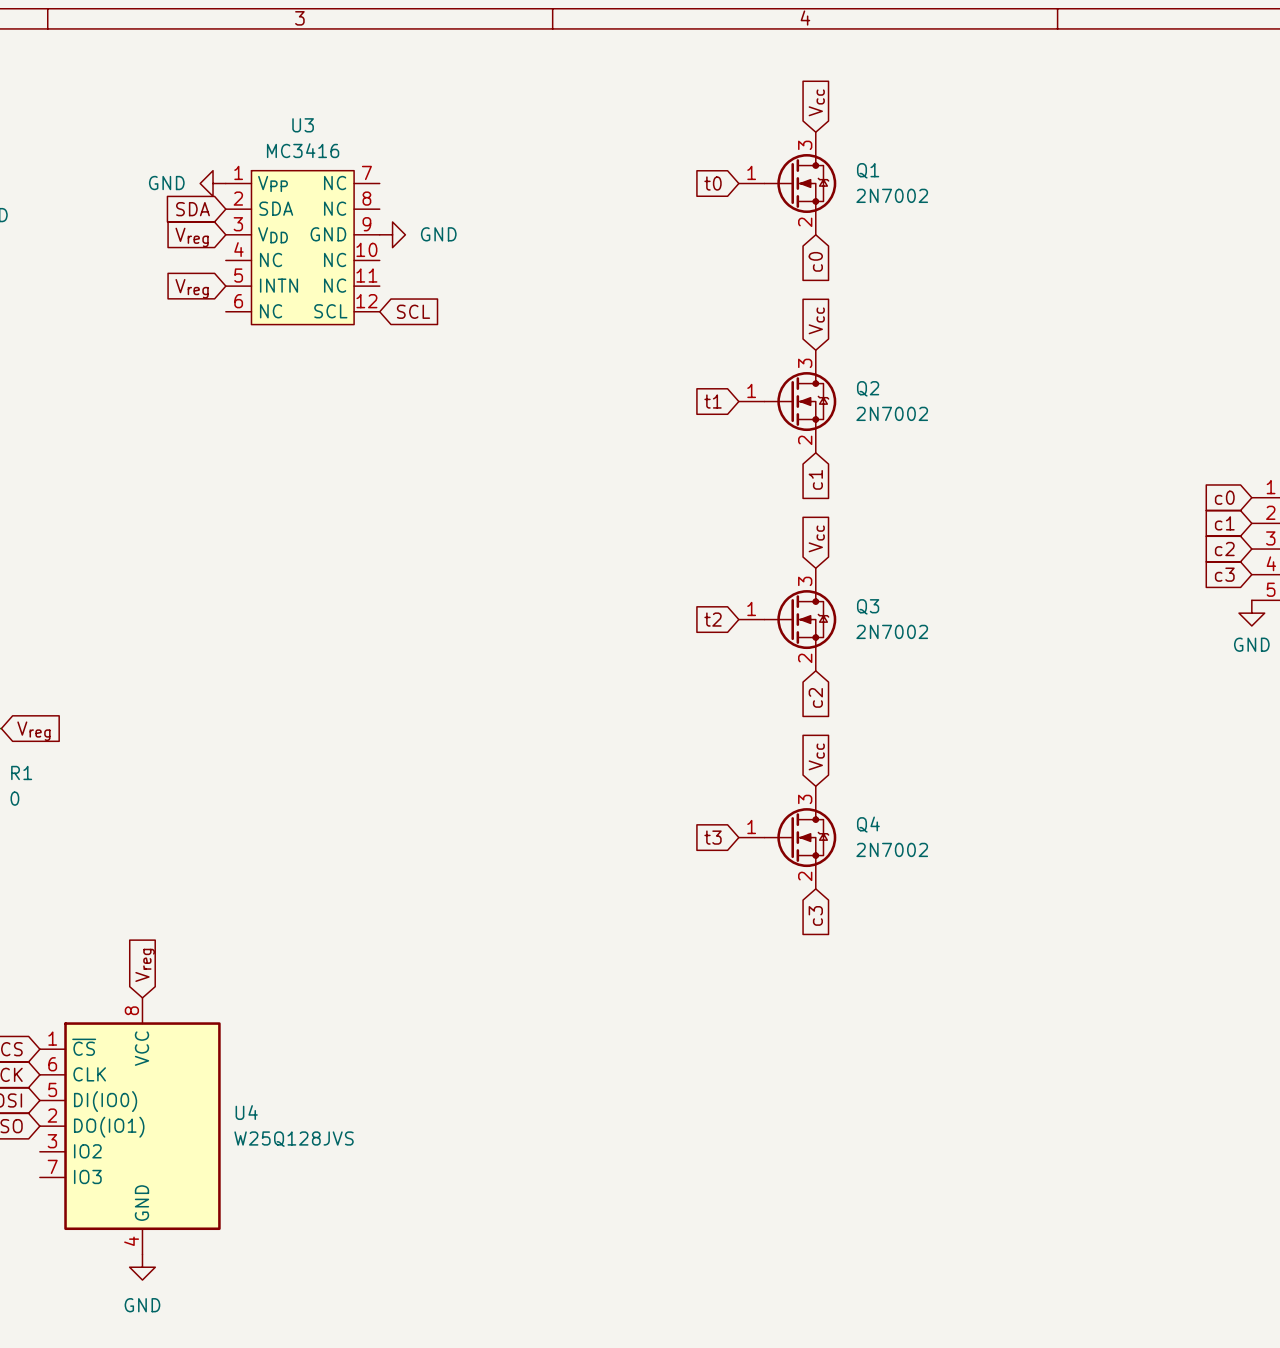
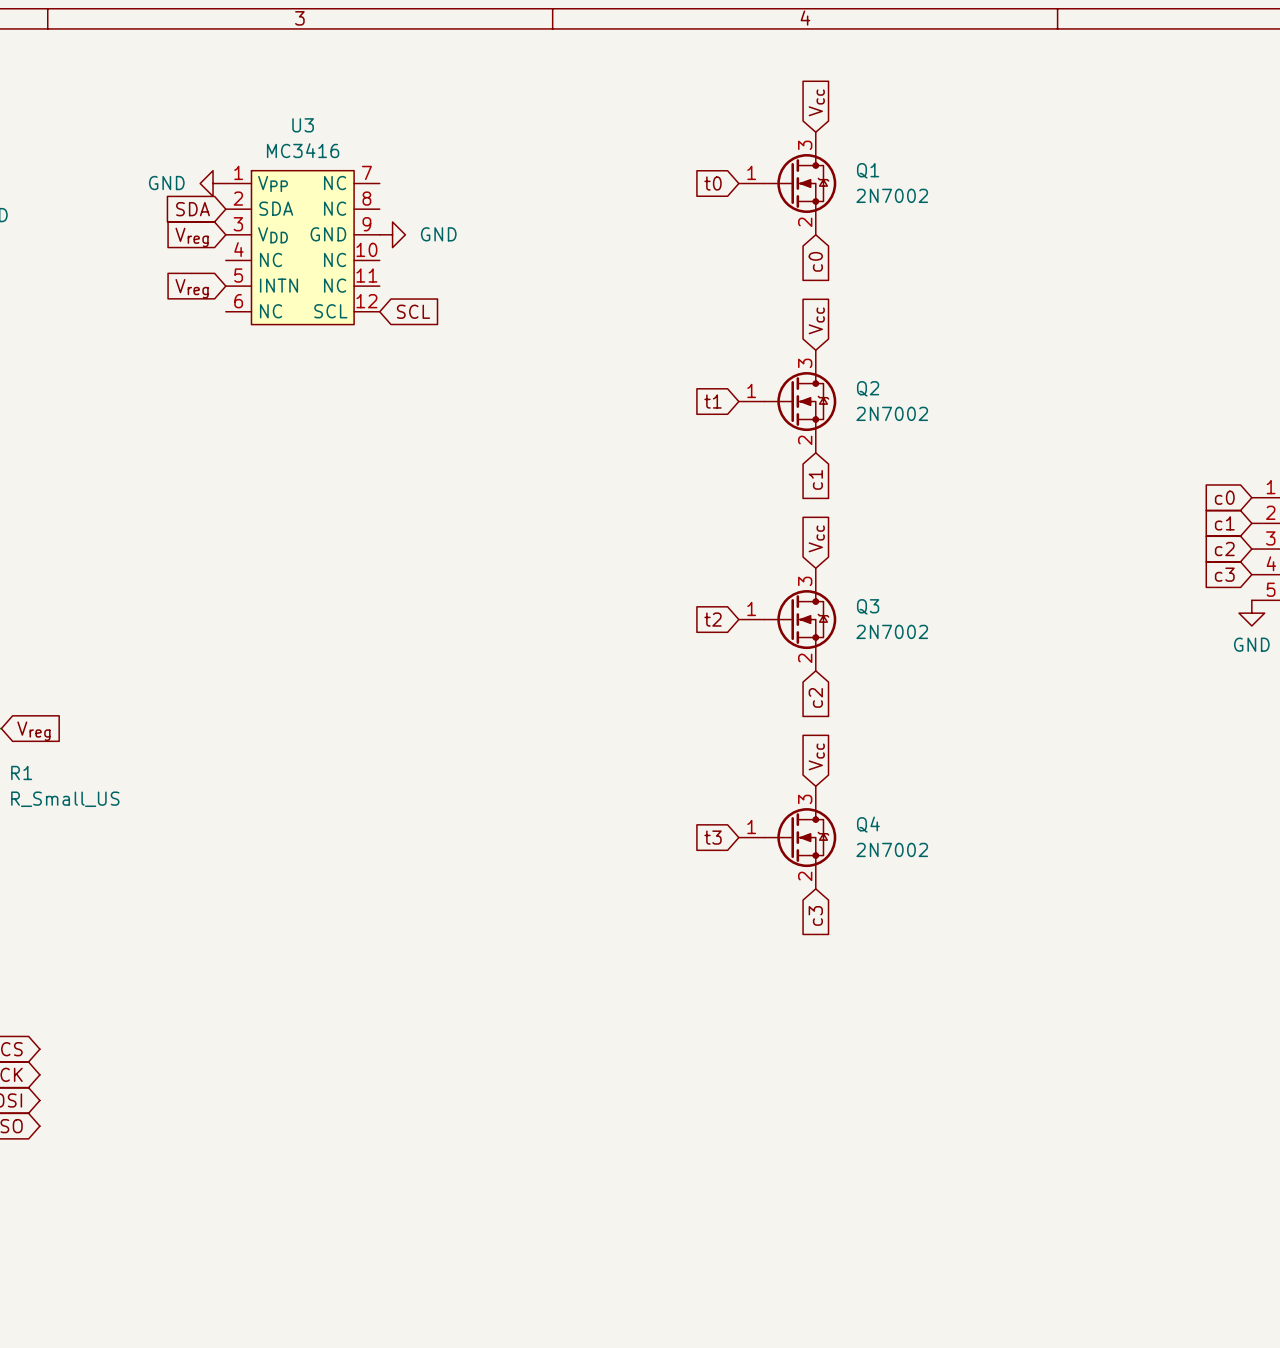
R1 value: 0 (14, 798) -> R_Small_US (65, 799)
global label: Vreg (145, 965) -> none
U4: W25Q128JVS (130, 1126) -> none
power symbol: GND (142, 1267) -> none

